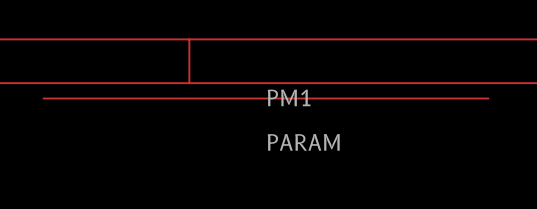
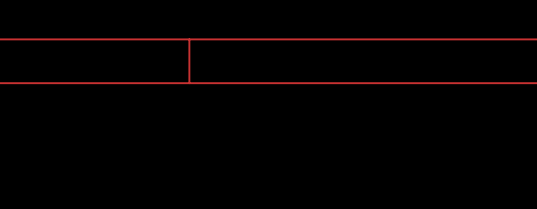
PM1: PARAM (266, 98) -> none

